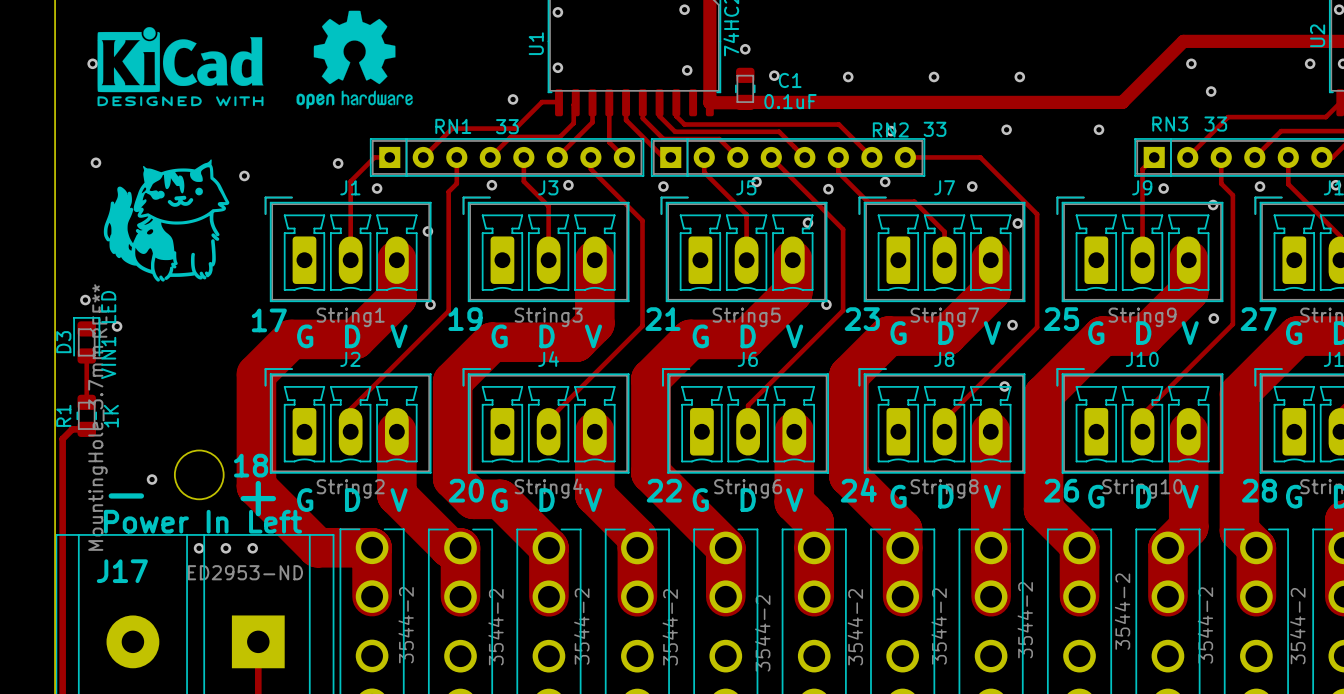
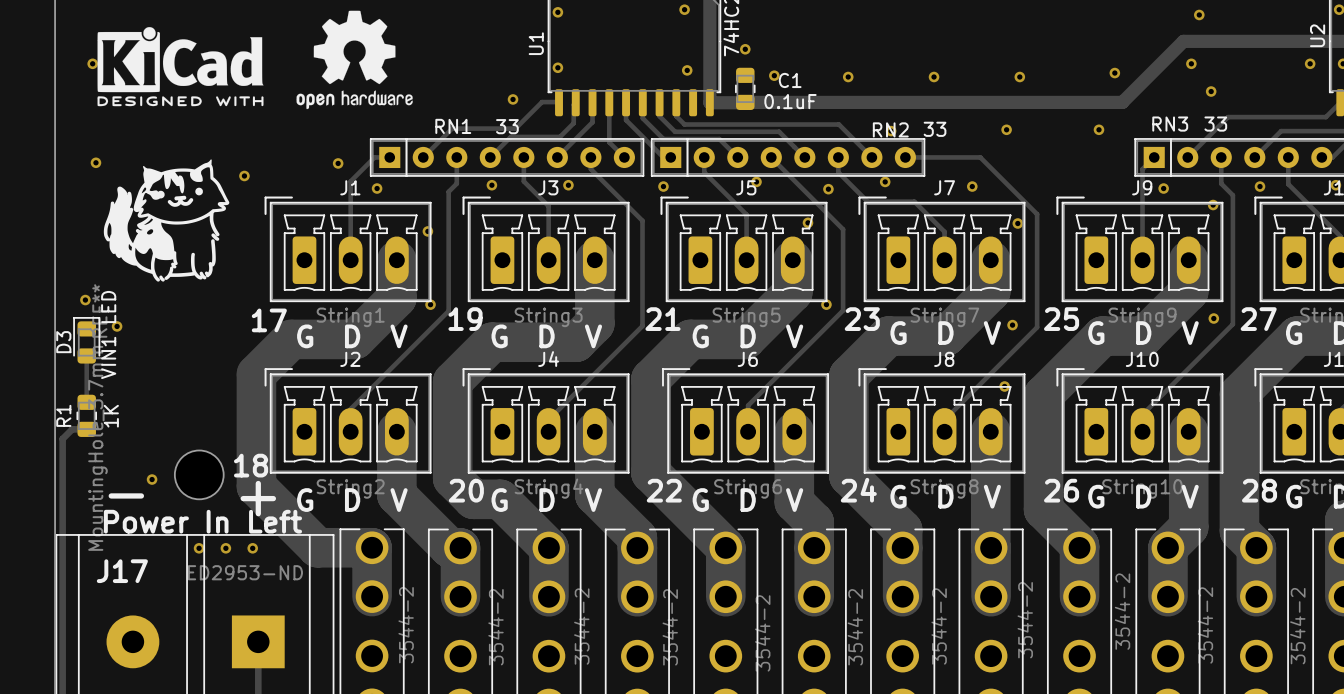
via: none -> (1199, 14)
via: none -> (1114, 73)

